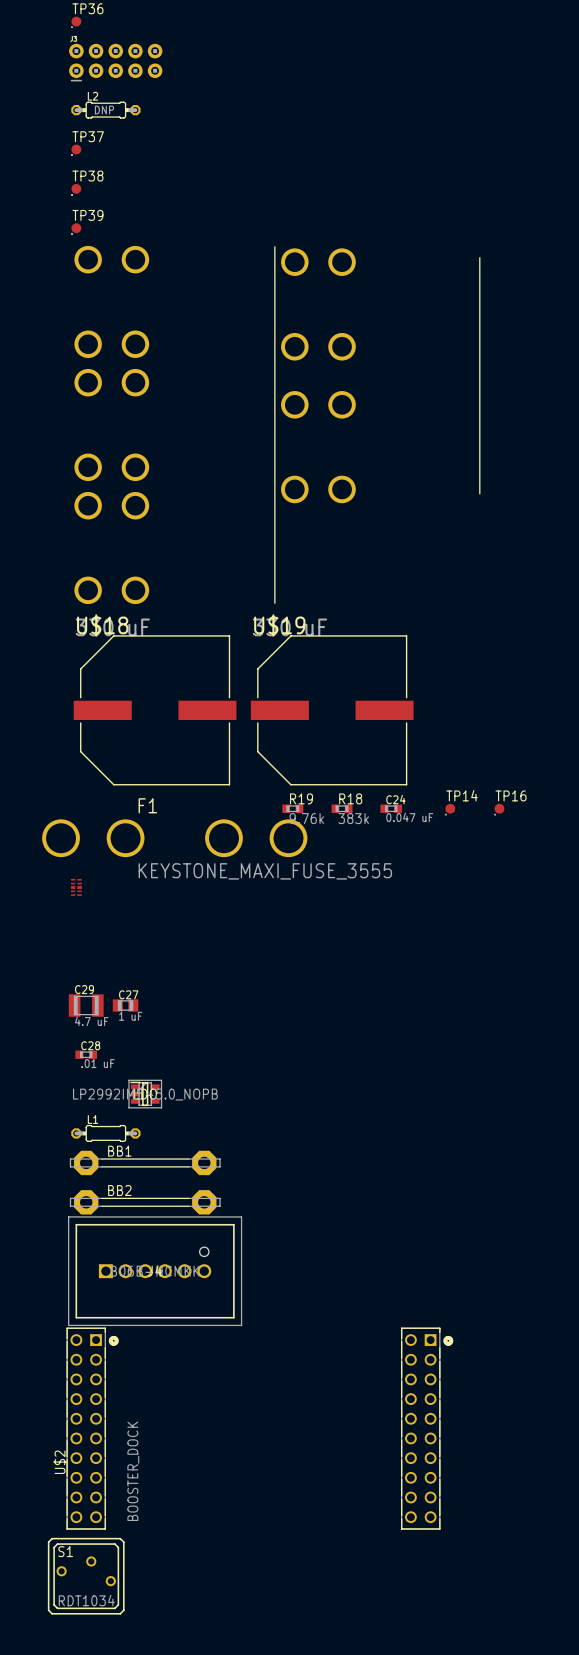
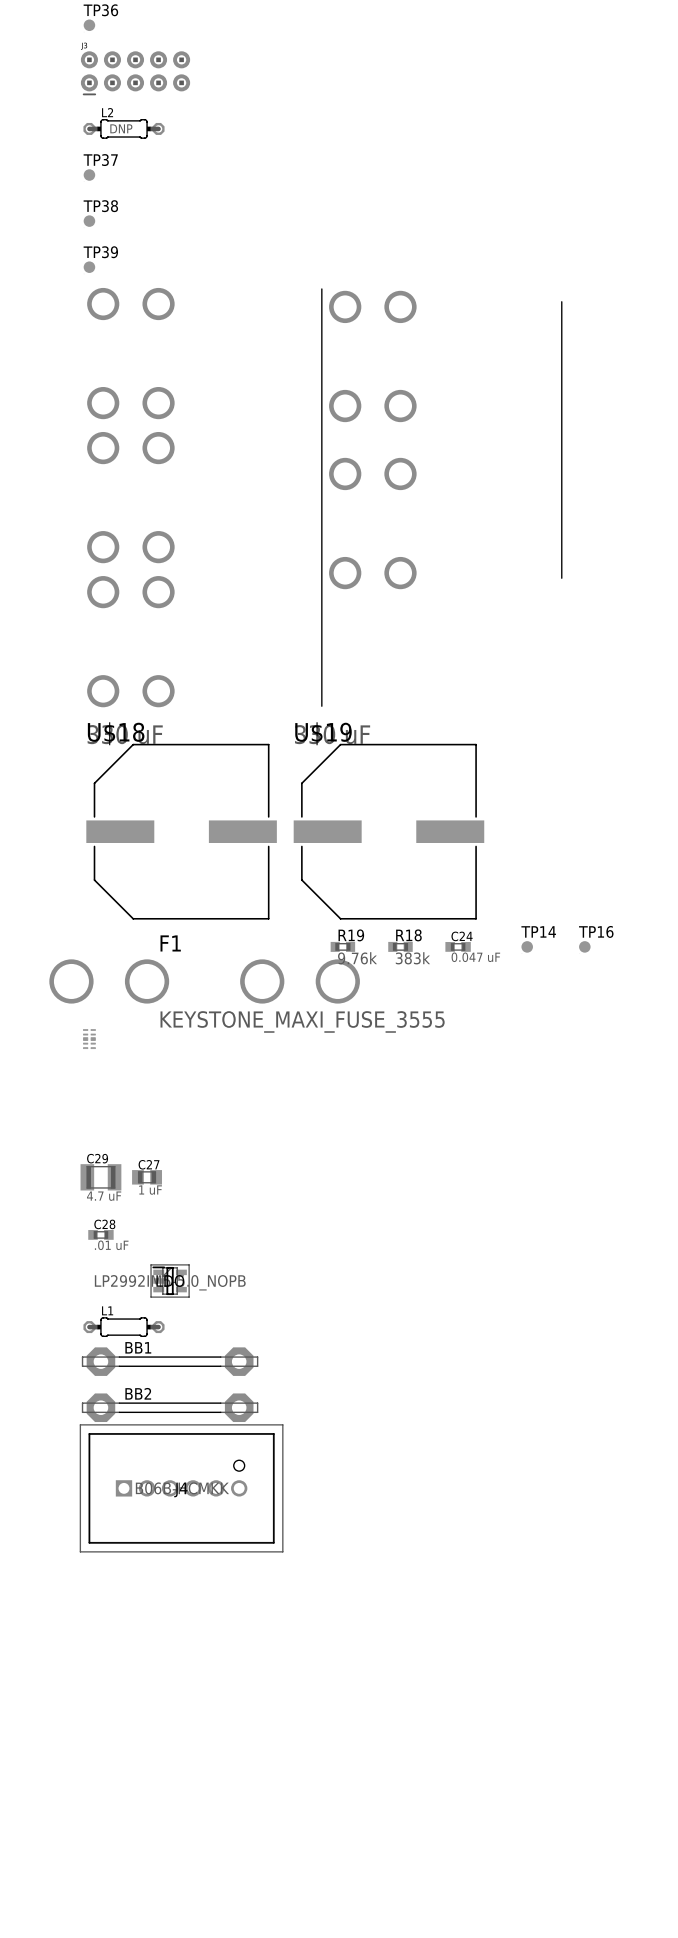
U$2: BOOSTER_DOCK (259, 1428) -> none
S1: RDT1034 (86, 1576) -> none

